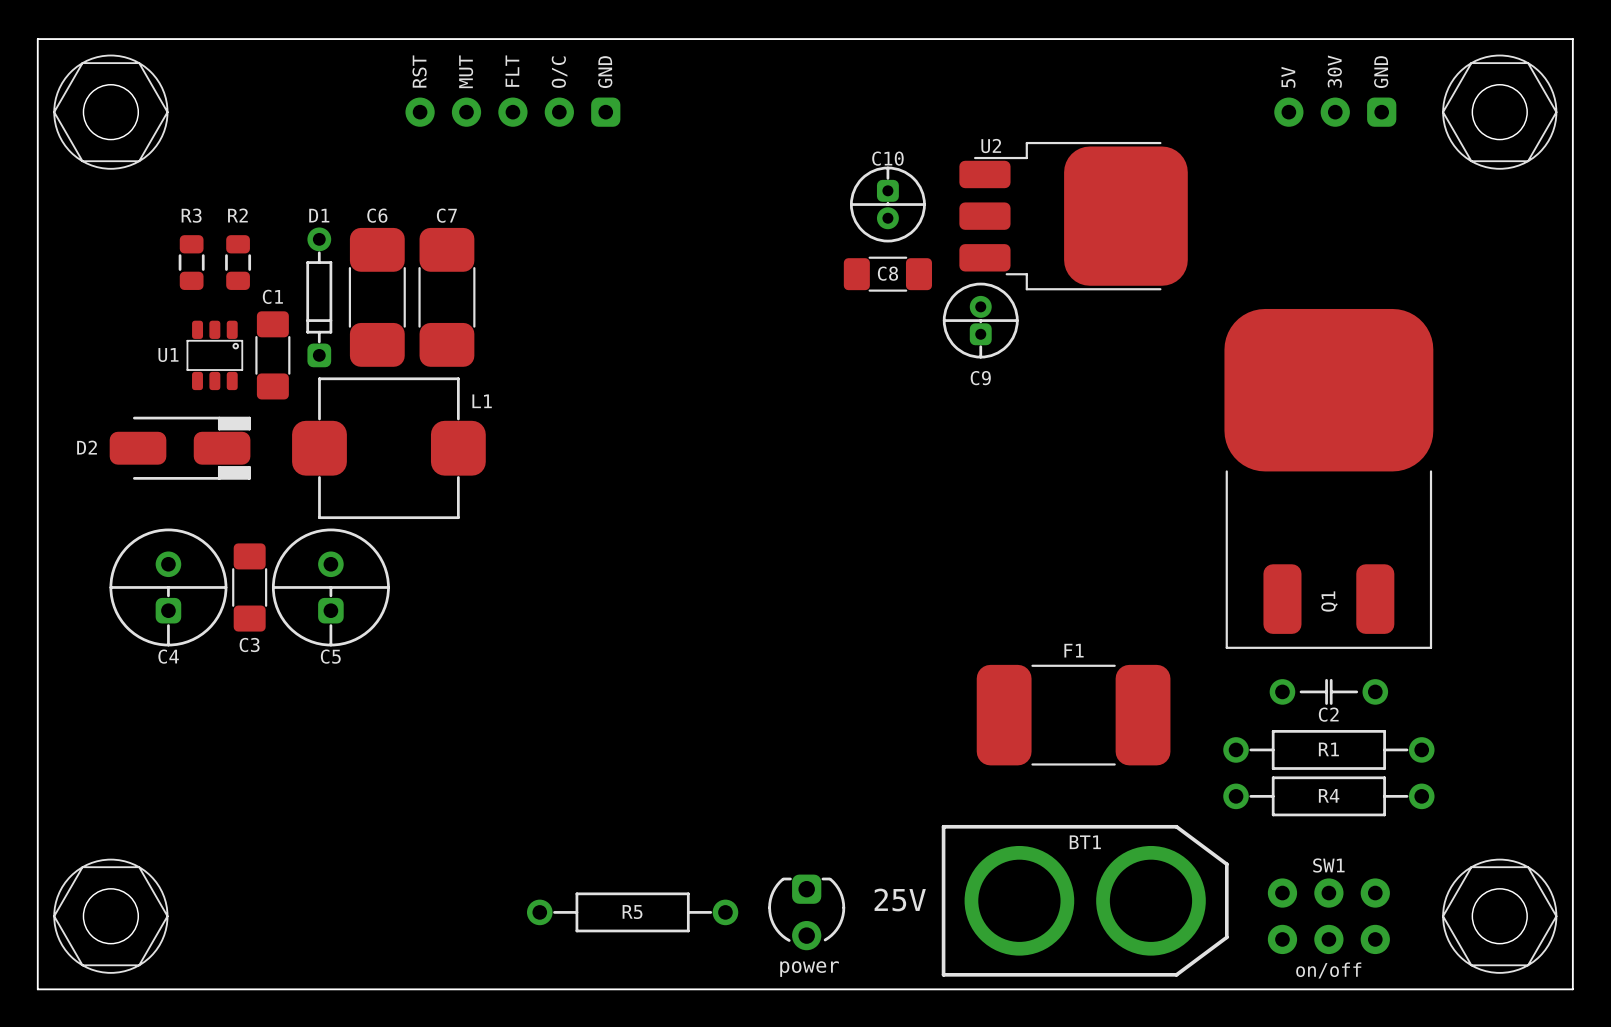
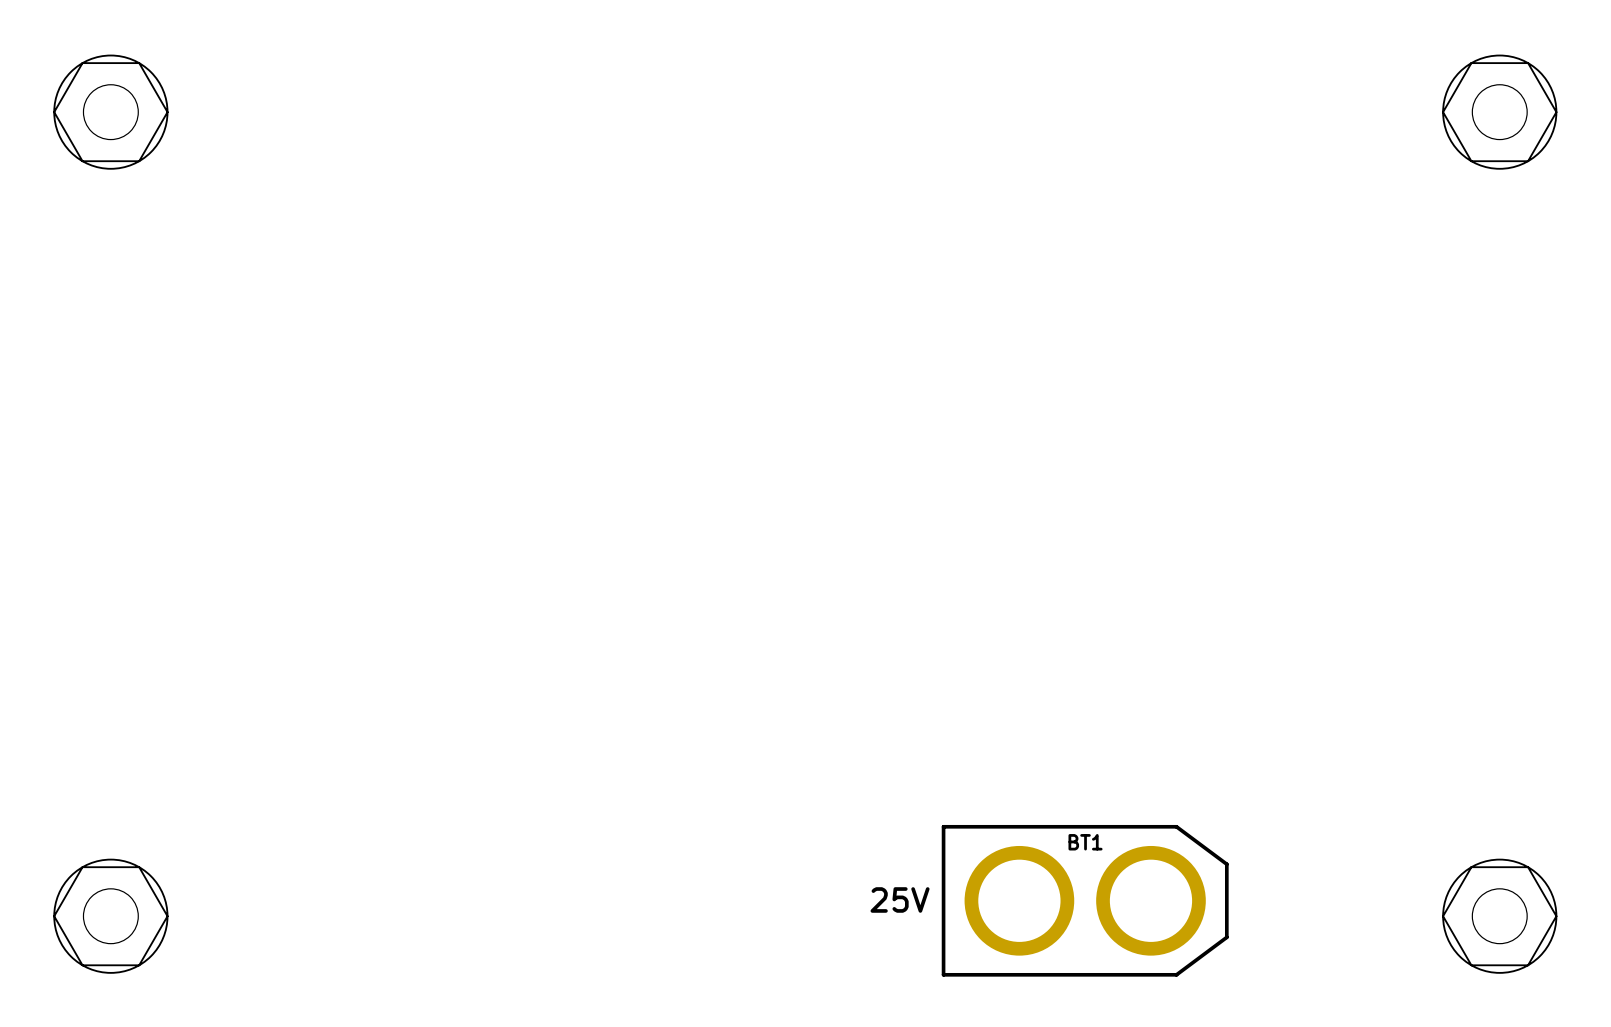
board edge: (37, 39) (1572, 39) (1572, 989) (37, 989) (37, 39) -> none
part: (512, 112) -> none
part: (1335, 112) -> none
C10: (887, 204) -> none
U2: (1073, 216) -> none
R3: (191, 262) -> none
R2: (238, 262) -> none
C8: (887, 274) -> none
D1: (319, 297) -> none
C6: (377, 297) -> none
C7: (446, 297) -> none
C9: (980, 320) -> none
U1: (214, 355) -> none
C1: (272, 355) -> none
D2: (180, 448) -> none
L1: (388, 448) -> none
Q1: (1328, 478) -> none
C4: (168, 587) -> none
C3: (249, 587) -> none
C5: (330, 587) -> none
C2: (1328, 691) -> none
F1: (1073, 715) -> none
R1: (1328, 749) -> none
R4: (1328, 796) -> none
R5: (632, 912) -> none
part: power (806, 912) -> none
SW1: on/off (1328, 916) -> none

